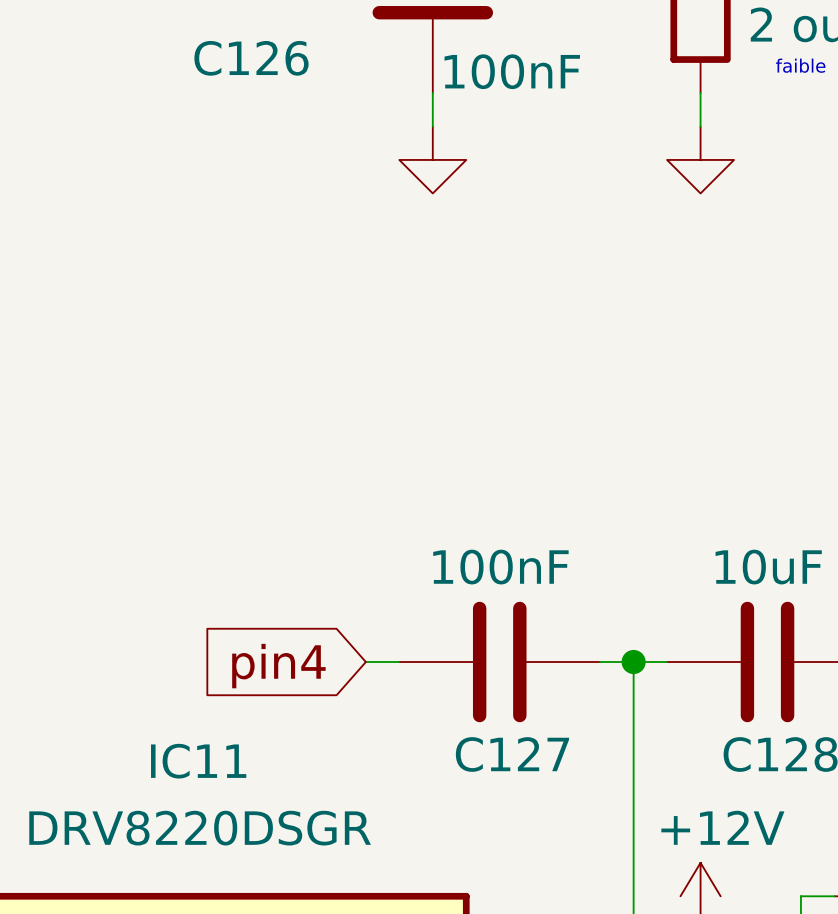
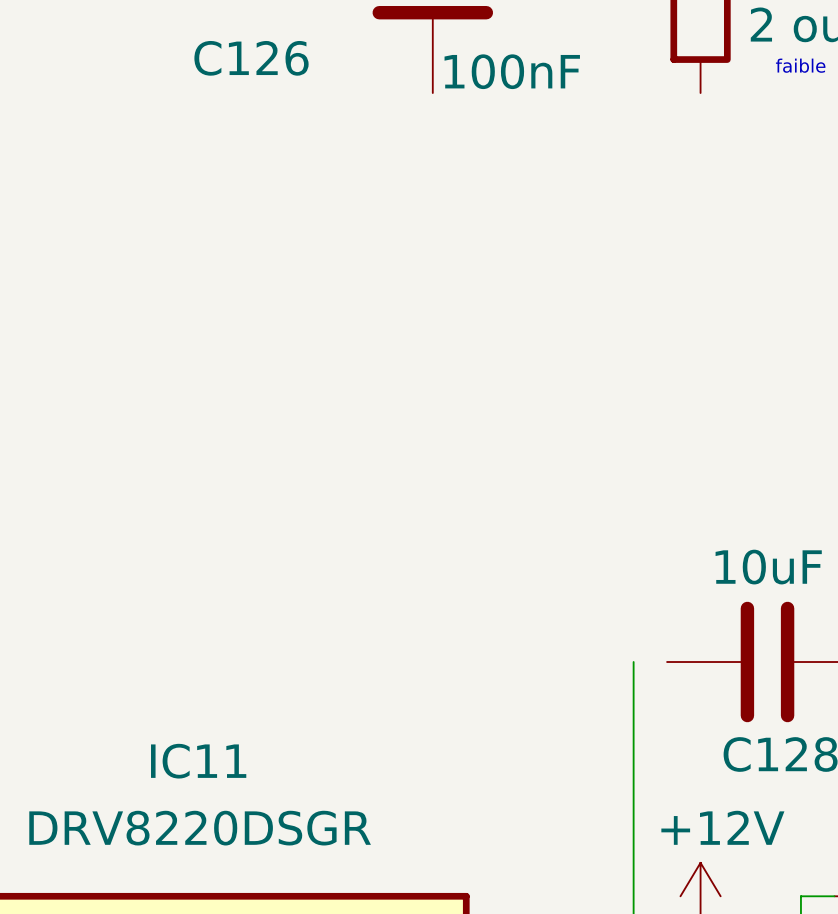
wire: (432, 93) (432, 126) -> none
wire: (700, 93) (700, 126) -> none
power symbol: (432, 159) -> none
power symbol: (700, 159) -> none
wire: (365, 662) (399, 662) -> none
C127: 100nF (499, 662) -> none
wire: (600, 662) (667, 662) -> none
junction: (633, 662) -> none
global label: pin4 (278, 666) -> none

